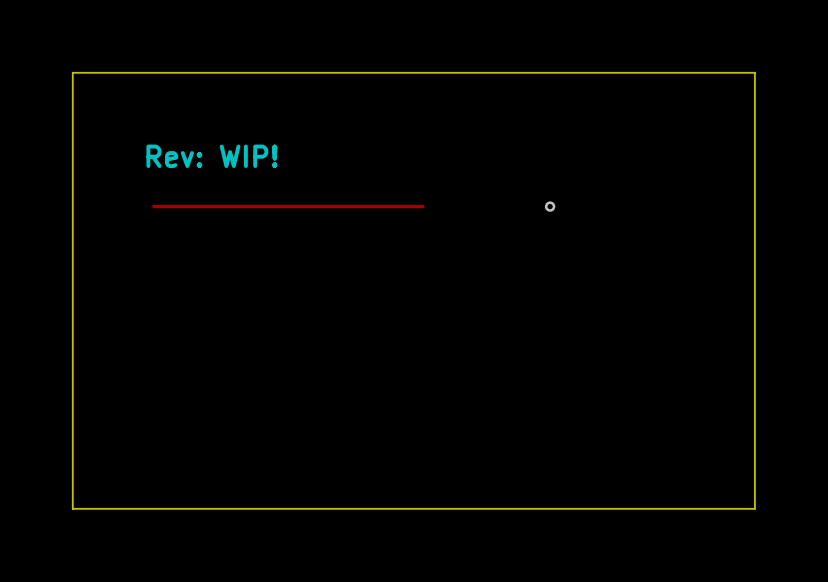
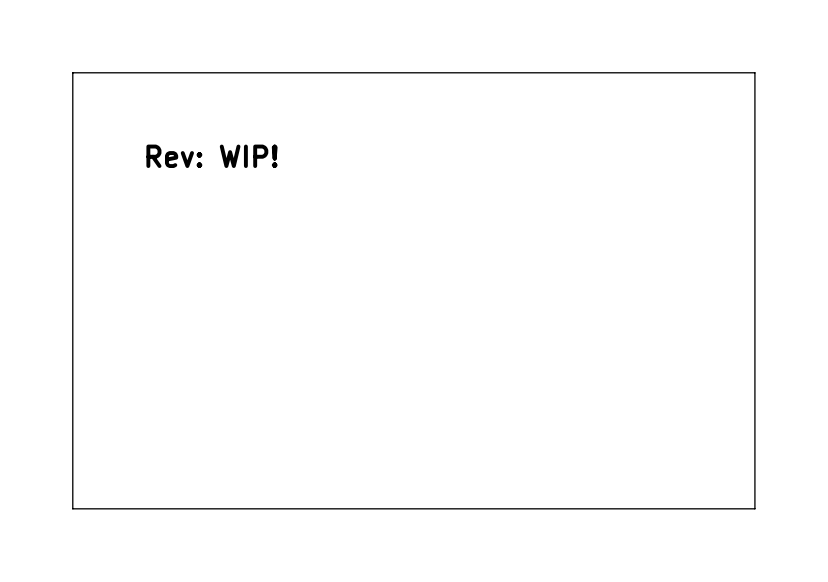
track: (153, 206) (422, 206) -> none
via: (550, 206) -> none

